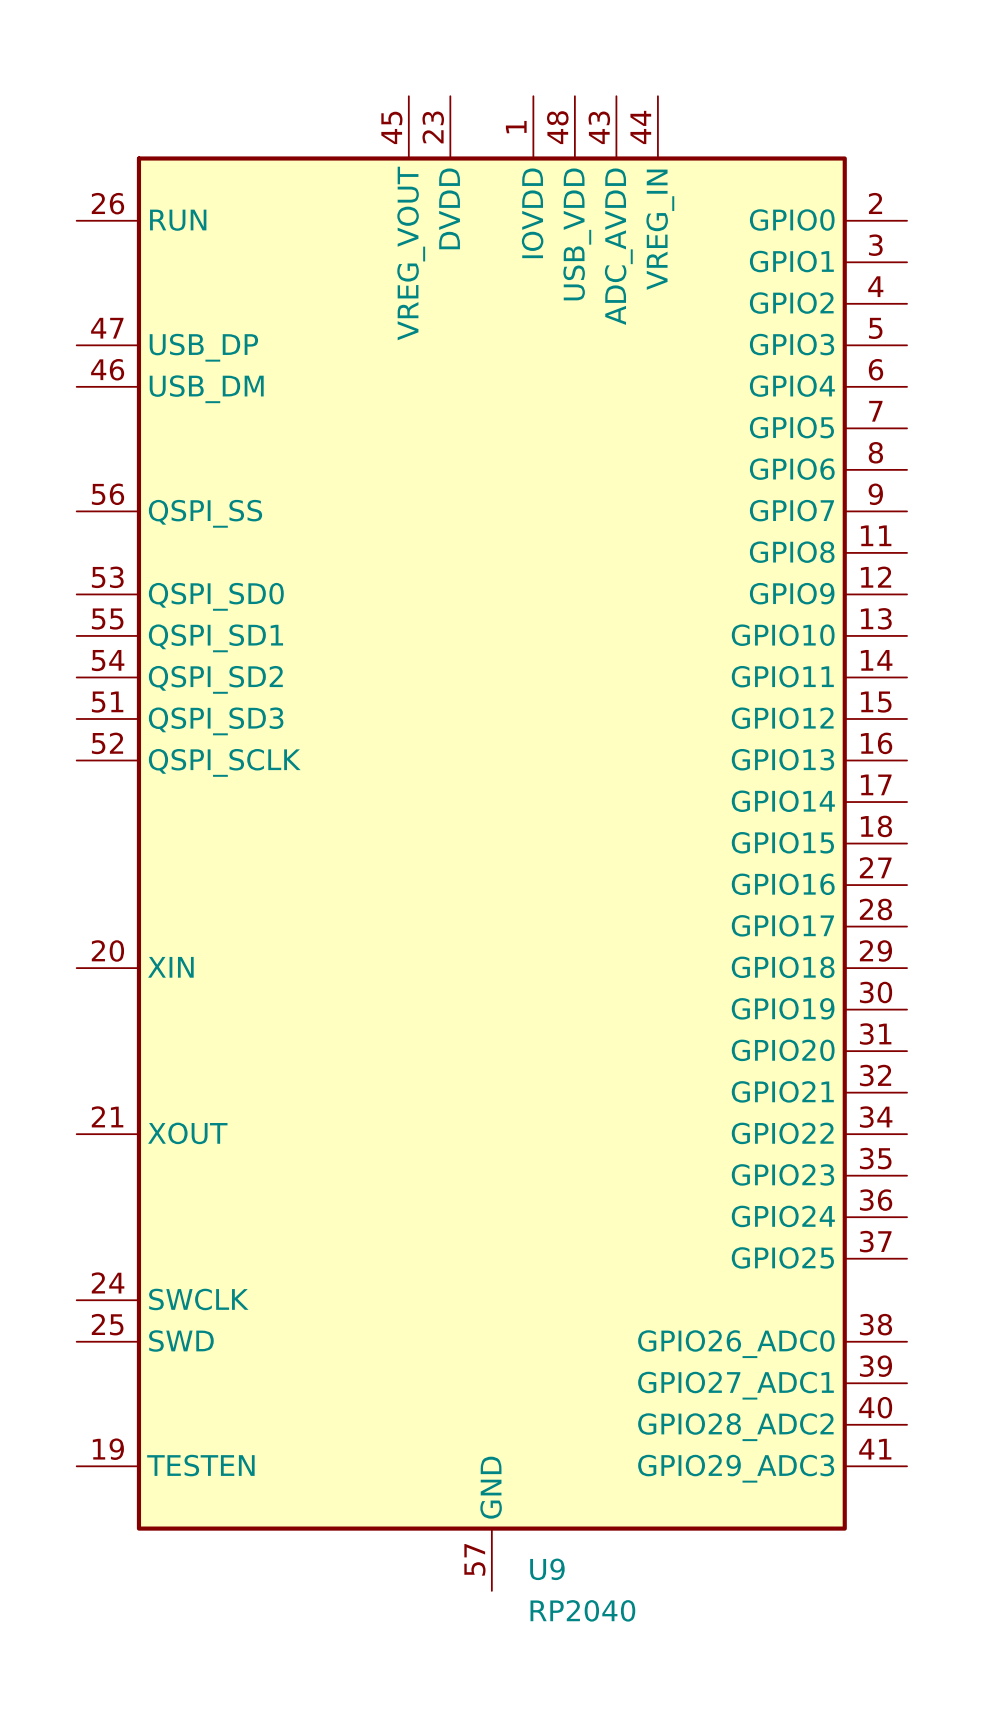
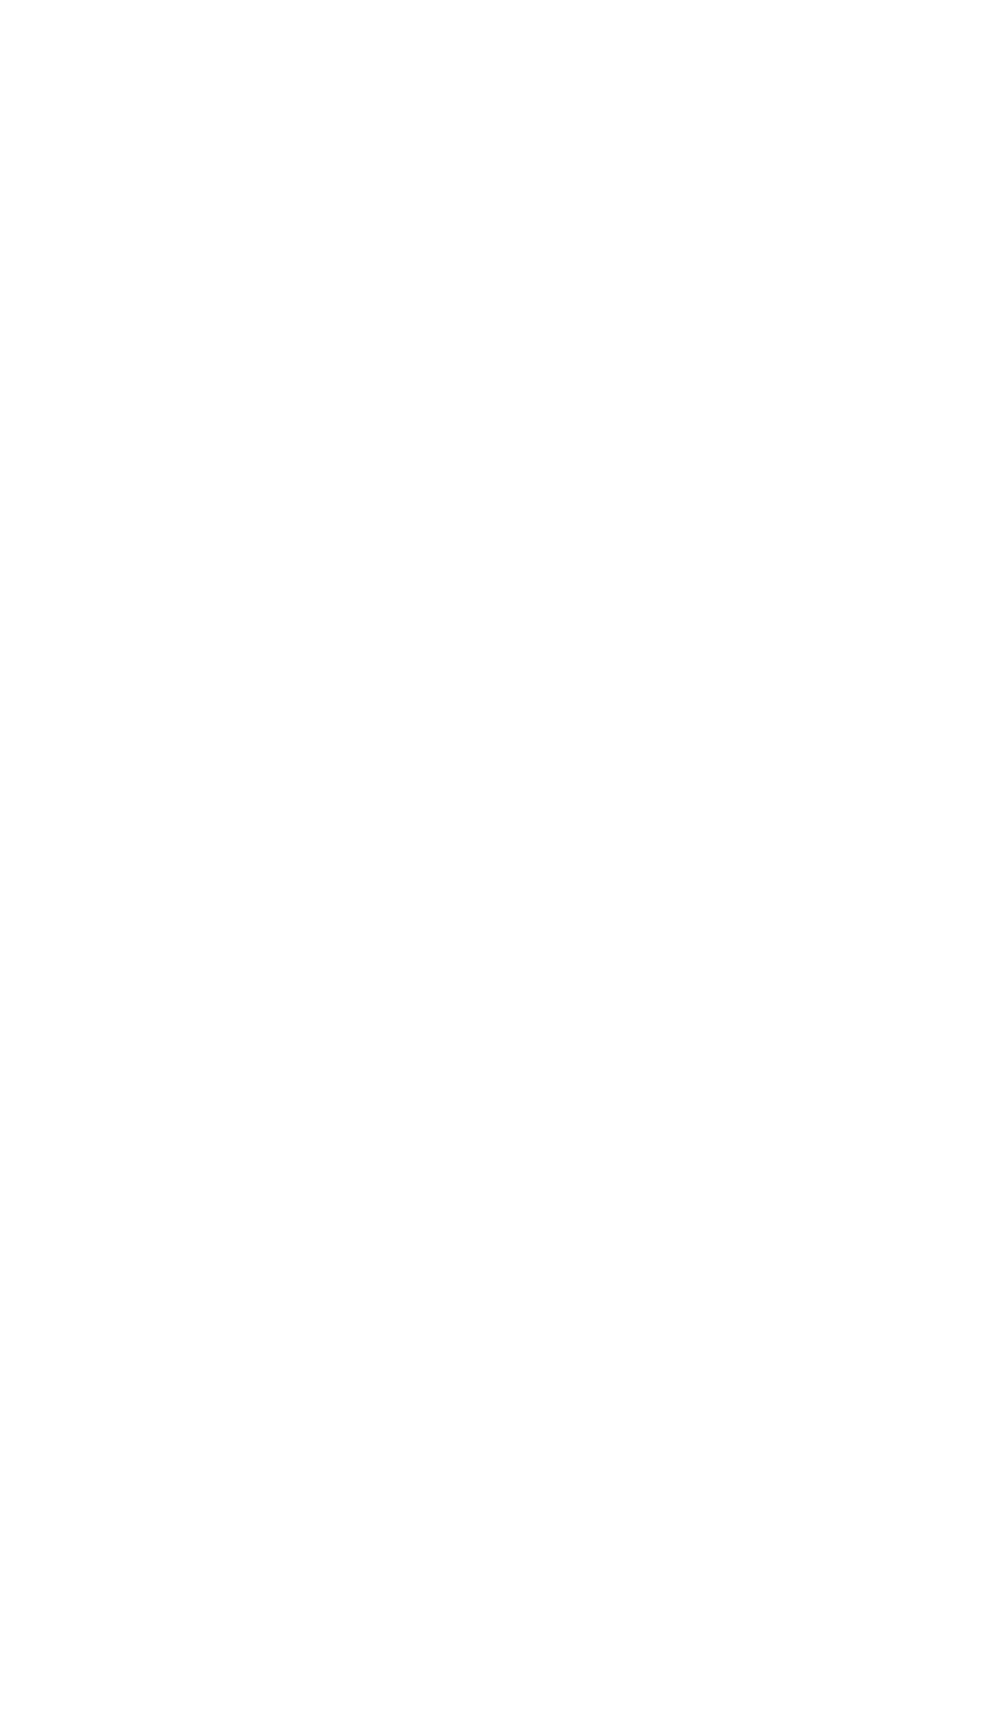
U9: RP2040 (491, 843) -> none

